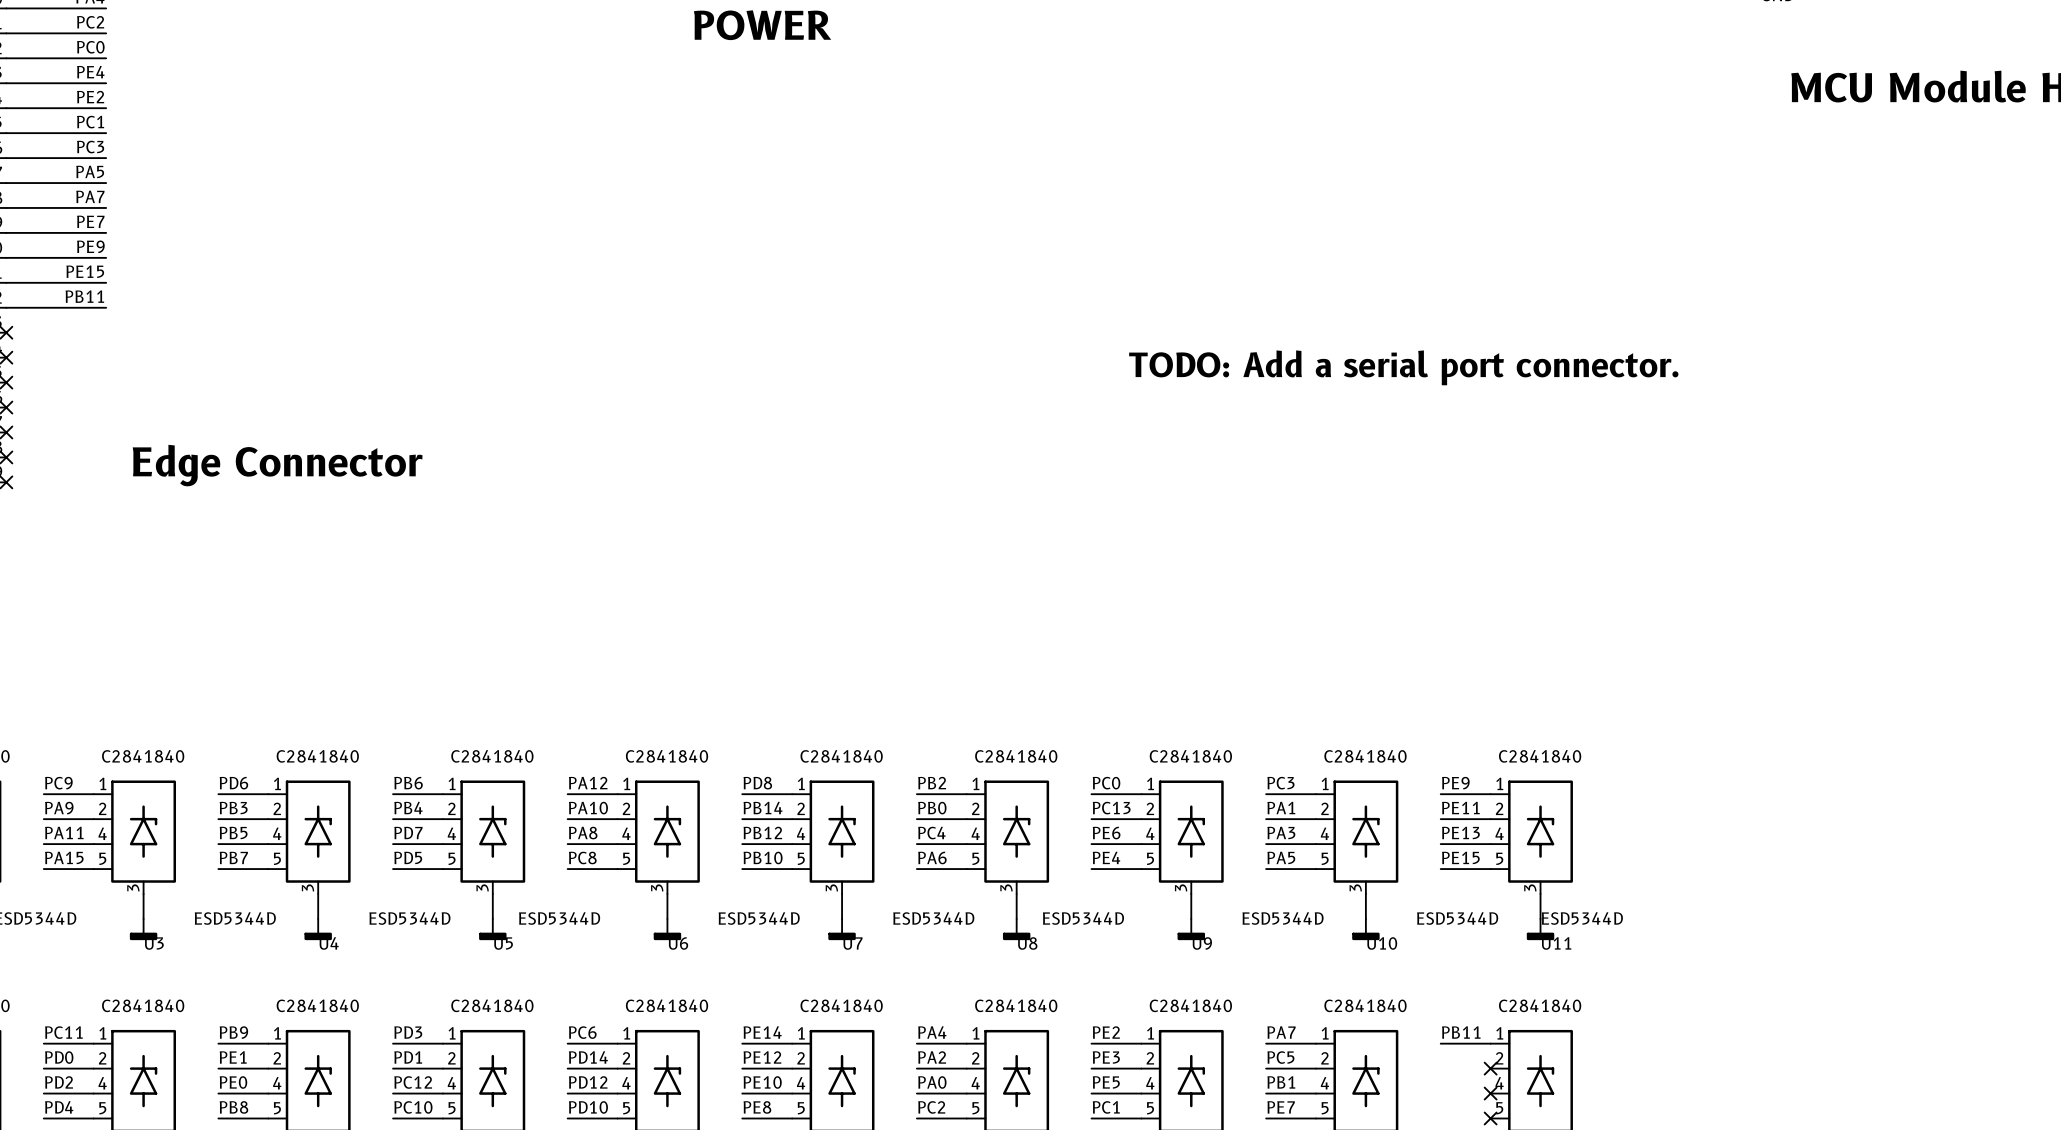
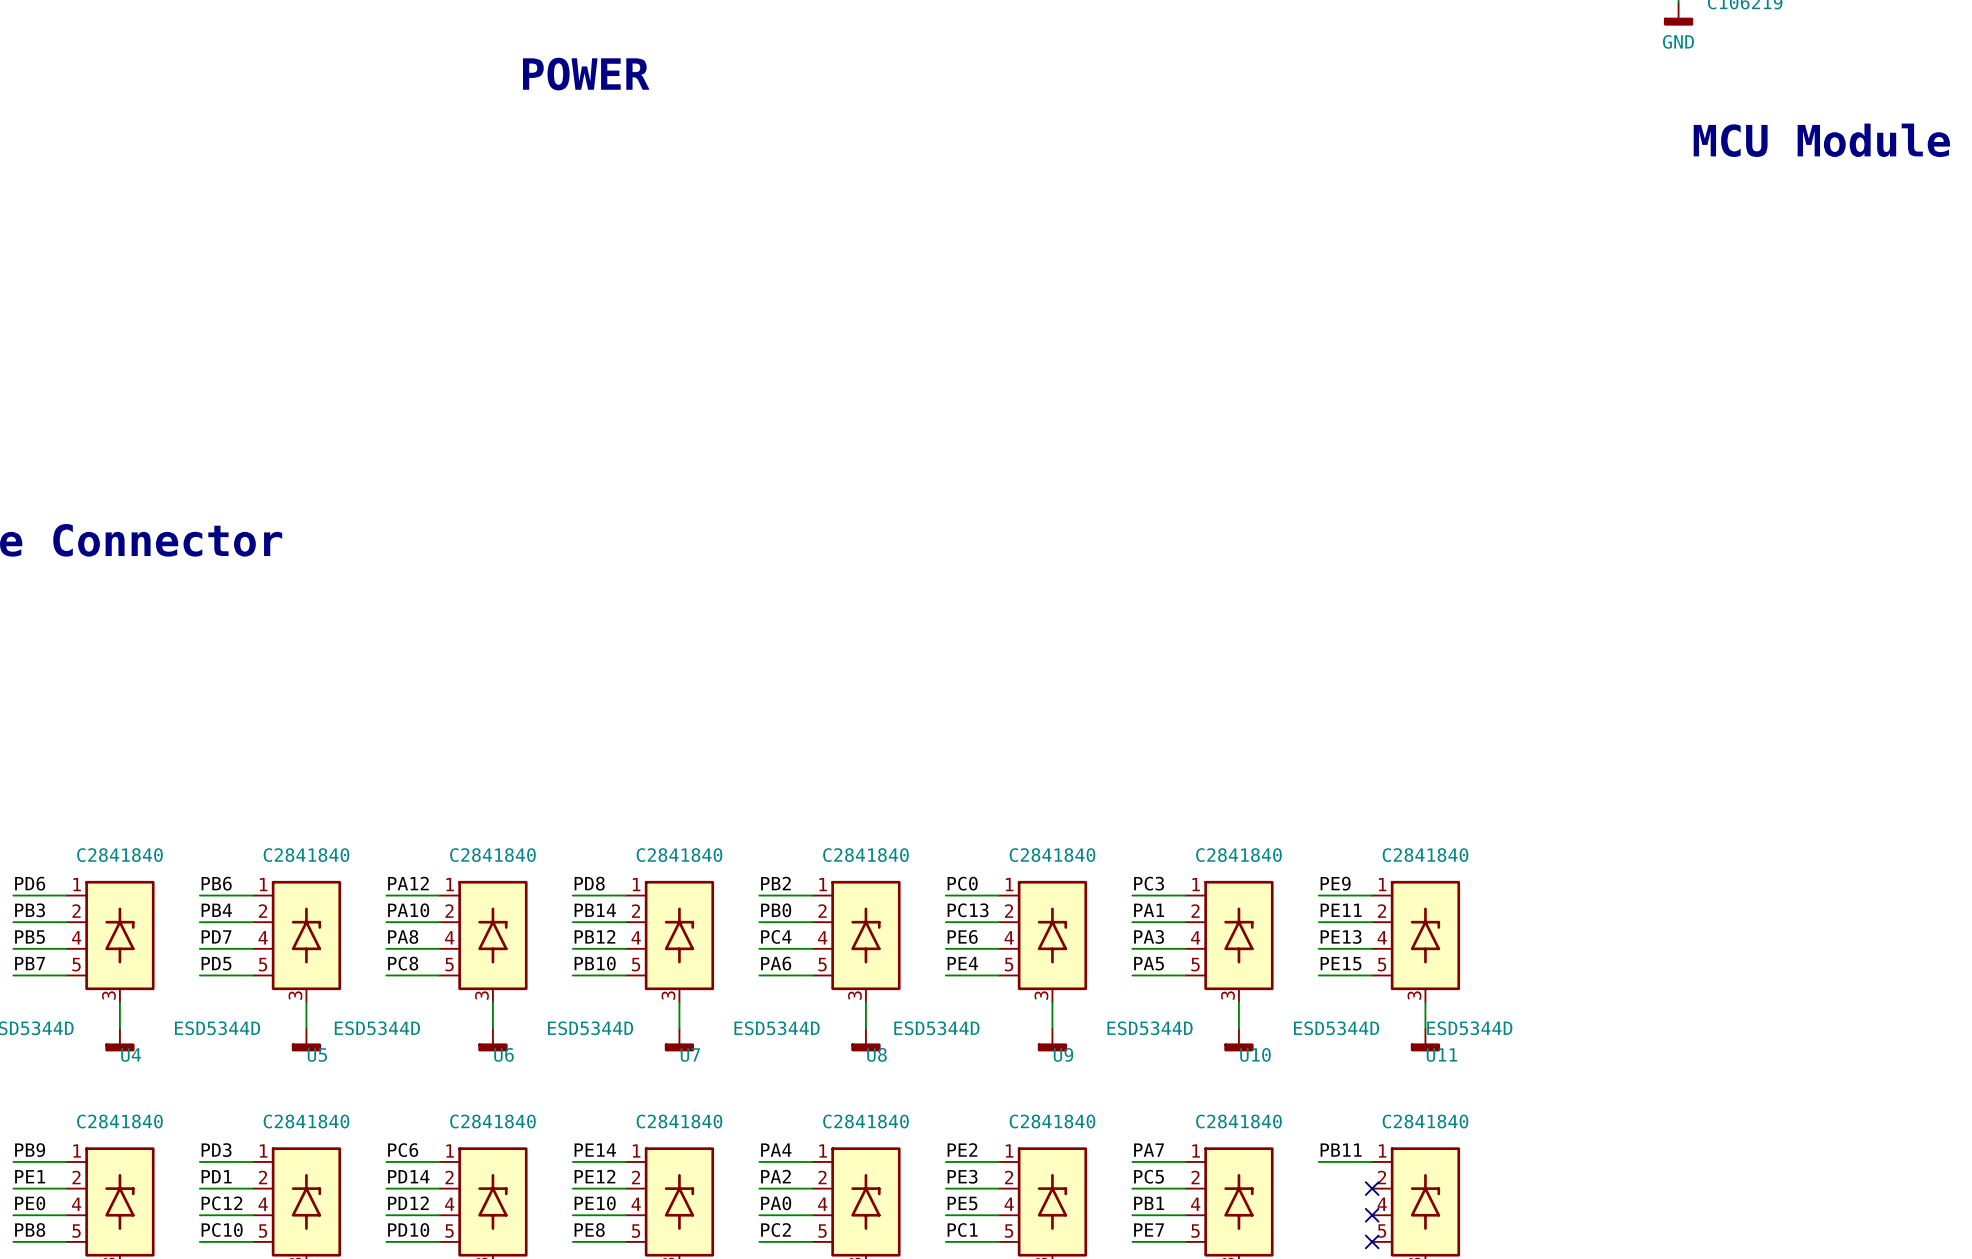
text: TODO: Add a serial port connector. (1403, 367) -> none

